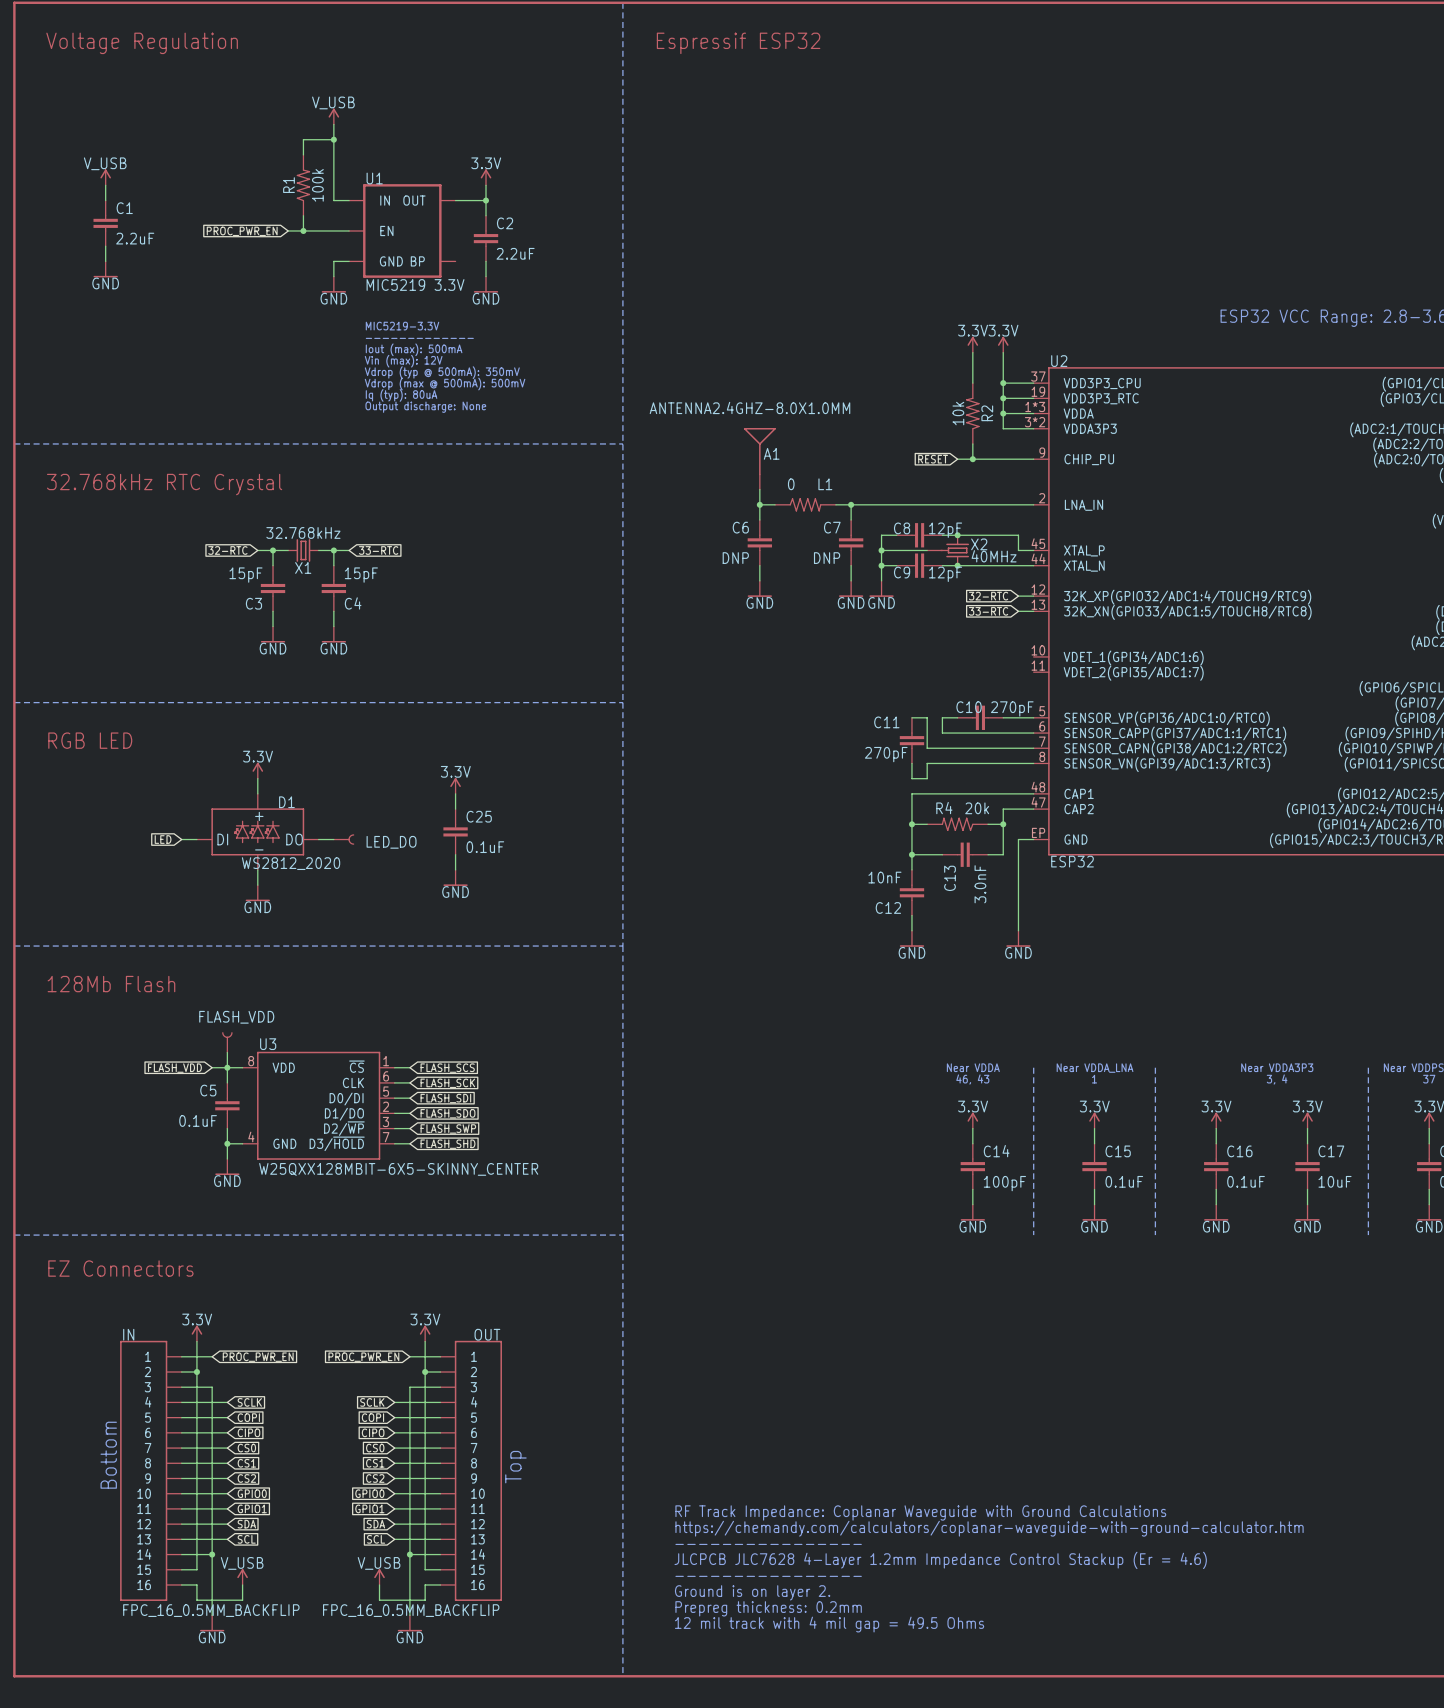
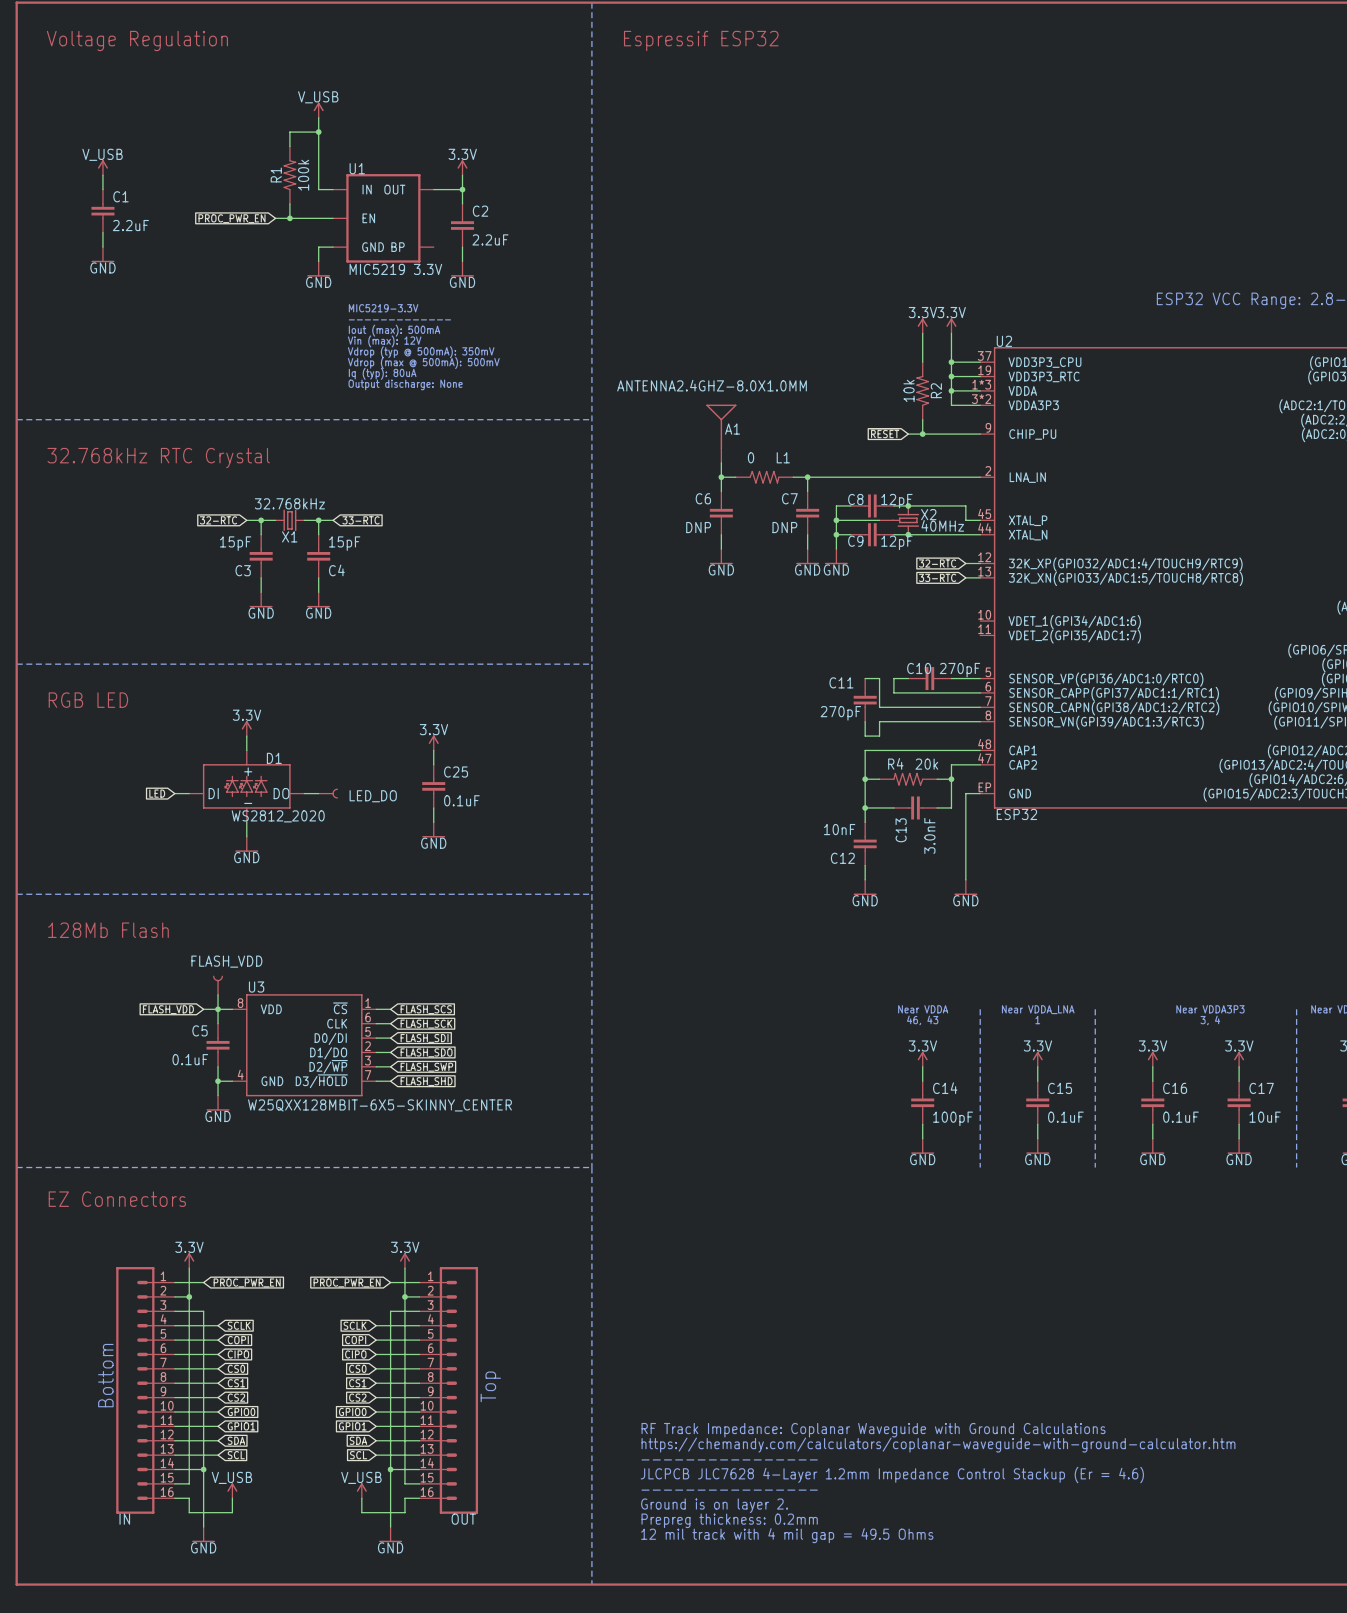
IN name position: IN (128, 1334) -> IN (124, 1519)
OUT name position: OUT (487, 1334) -> OUT (463, 1519)
IN symbol: [120, 1340, 182, 1601] -> [116, 1267, 175, 1514]
OUT symbol: [440, 1340, 502, 1601] -> [419, 1267, 479, 1514]
IN value: FPC_16_0.5MM_BACKFLIP (211, 1610) -> none
OUT value: FPC_16_0.5MM_BACKFLIP (411, 1610) -> none

